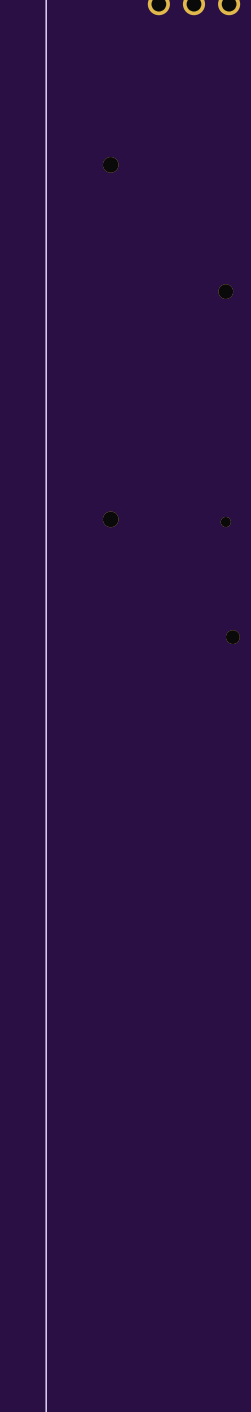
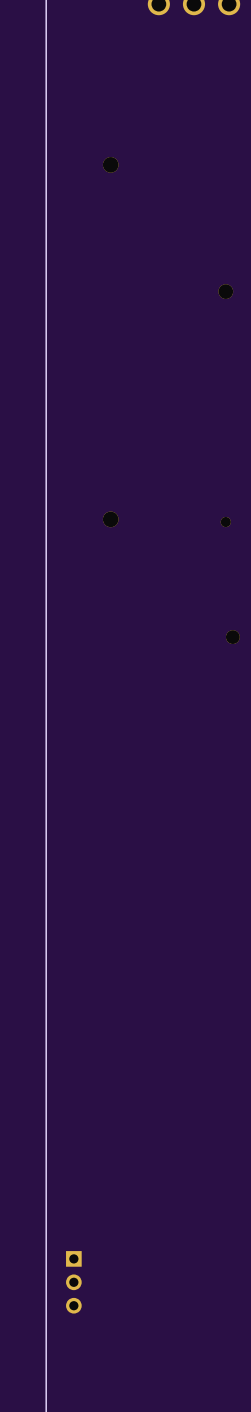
part: none -> (73, 1282)

